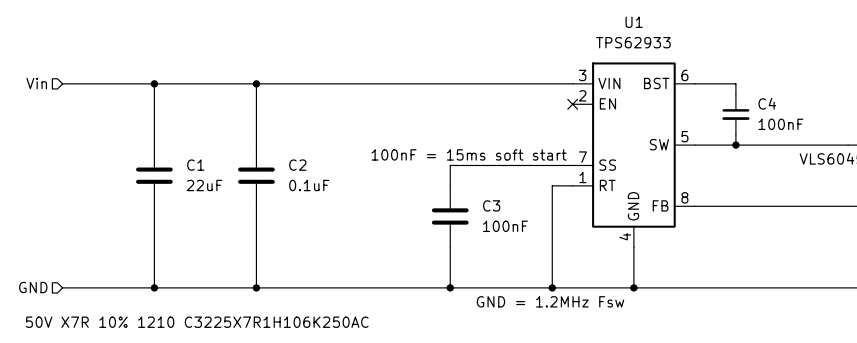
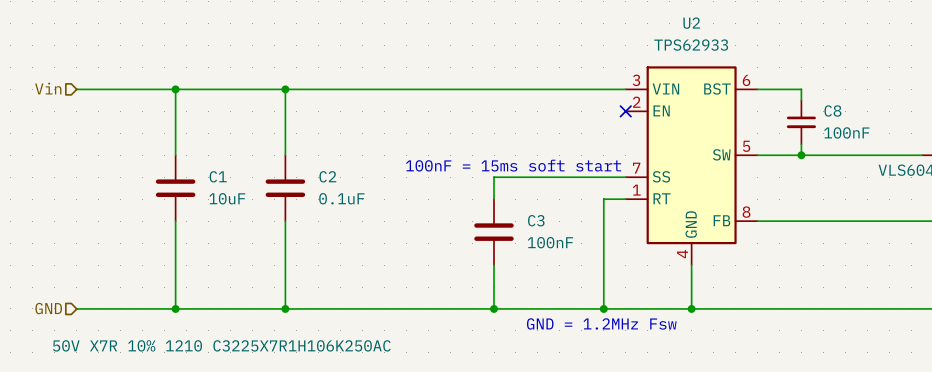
U1 name: U1 (634, 22) -> U2 (691, 23)
C4 name: C4 (767, 103) -> C8 (832, 110)
C1 value: 22uF (204, 185) -> 10uF (227, 198)

